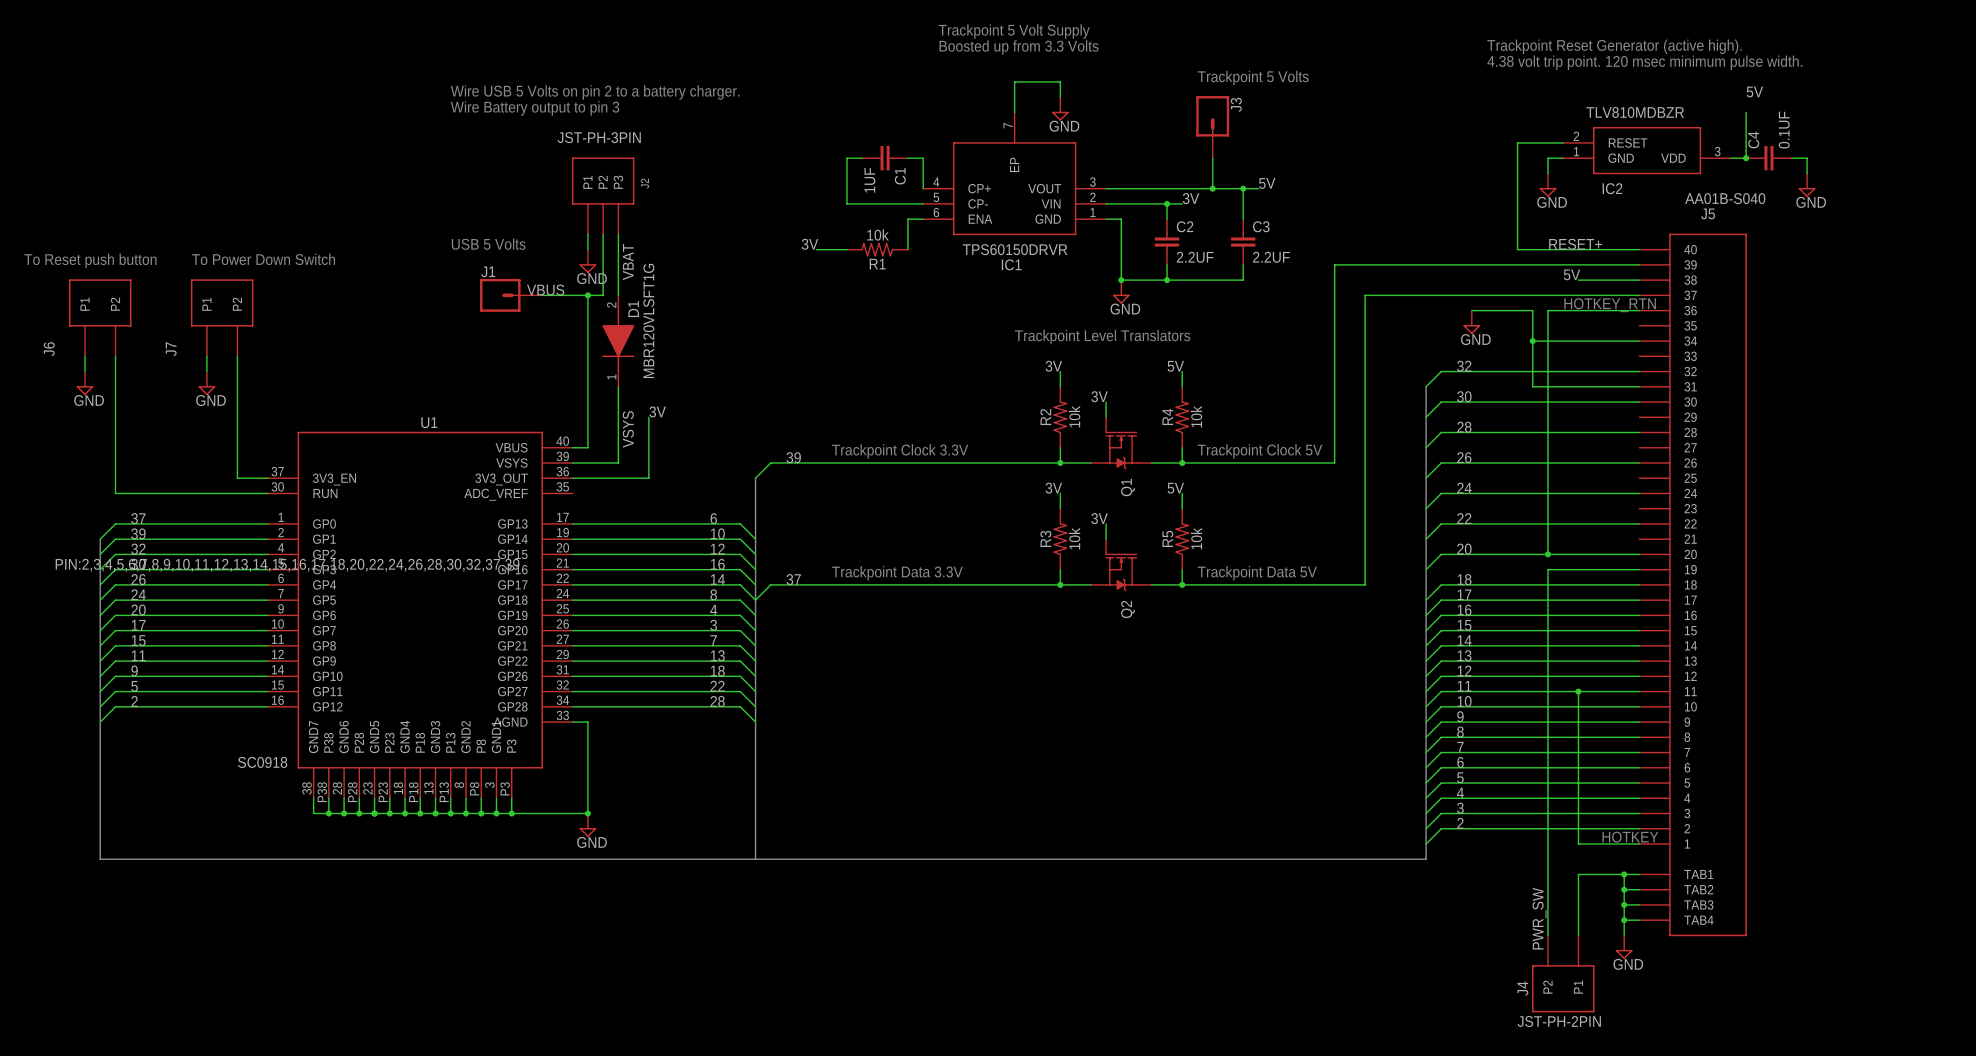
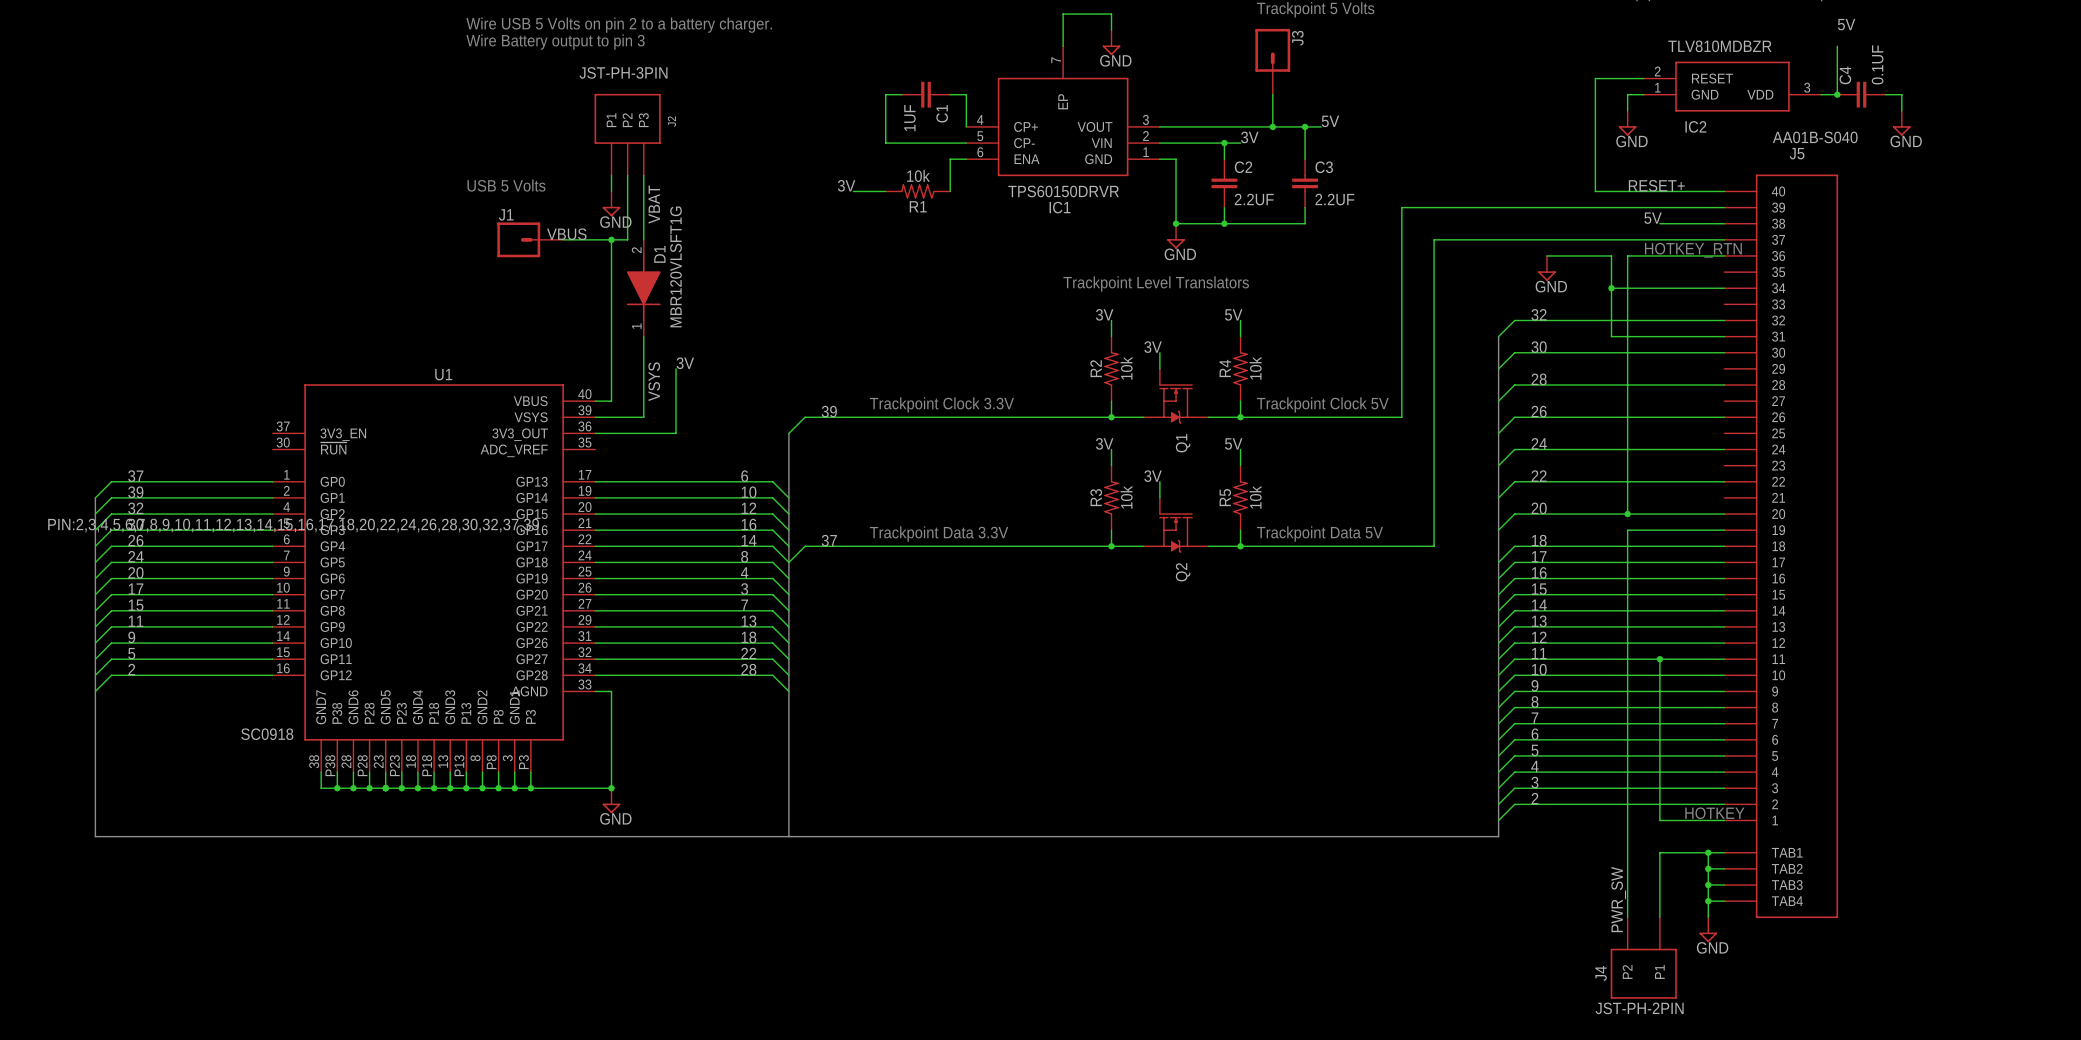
text: To Power Down Switch (263, 259) -> none
text: To Reset push button (90, 260) -> none
J6: (100, 317) -> none
J7: (222, 317) -> none
wire: (85, 356) (85, 371) -> none
wire: (115, 356) (115, 493) (267, 493) -> none
wire: (206, 356) (206, 371) -> none
wire: (237, 356) (237, 478) (267, 478) -> none
power symbol: GND (85, 383) -> none
power symbol: GND (206, 383) -> none
U1 pin name: RUN (325, 493) -> ~{RUN} (333, 448)

